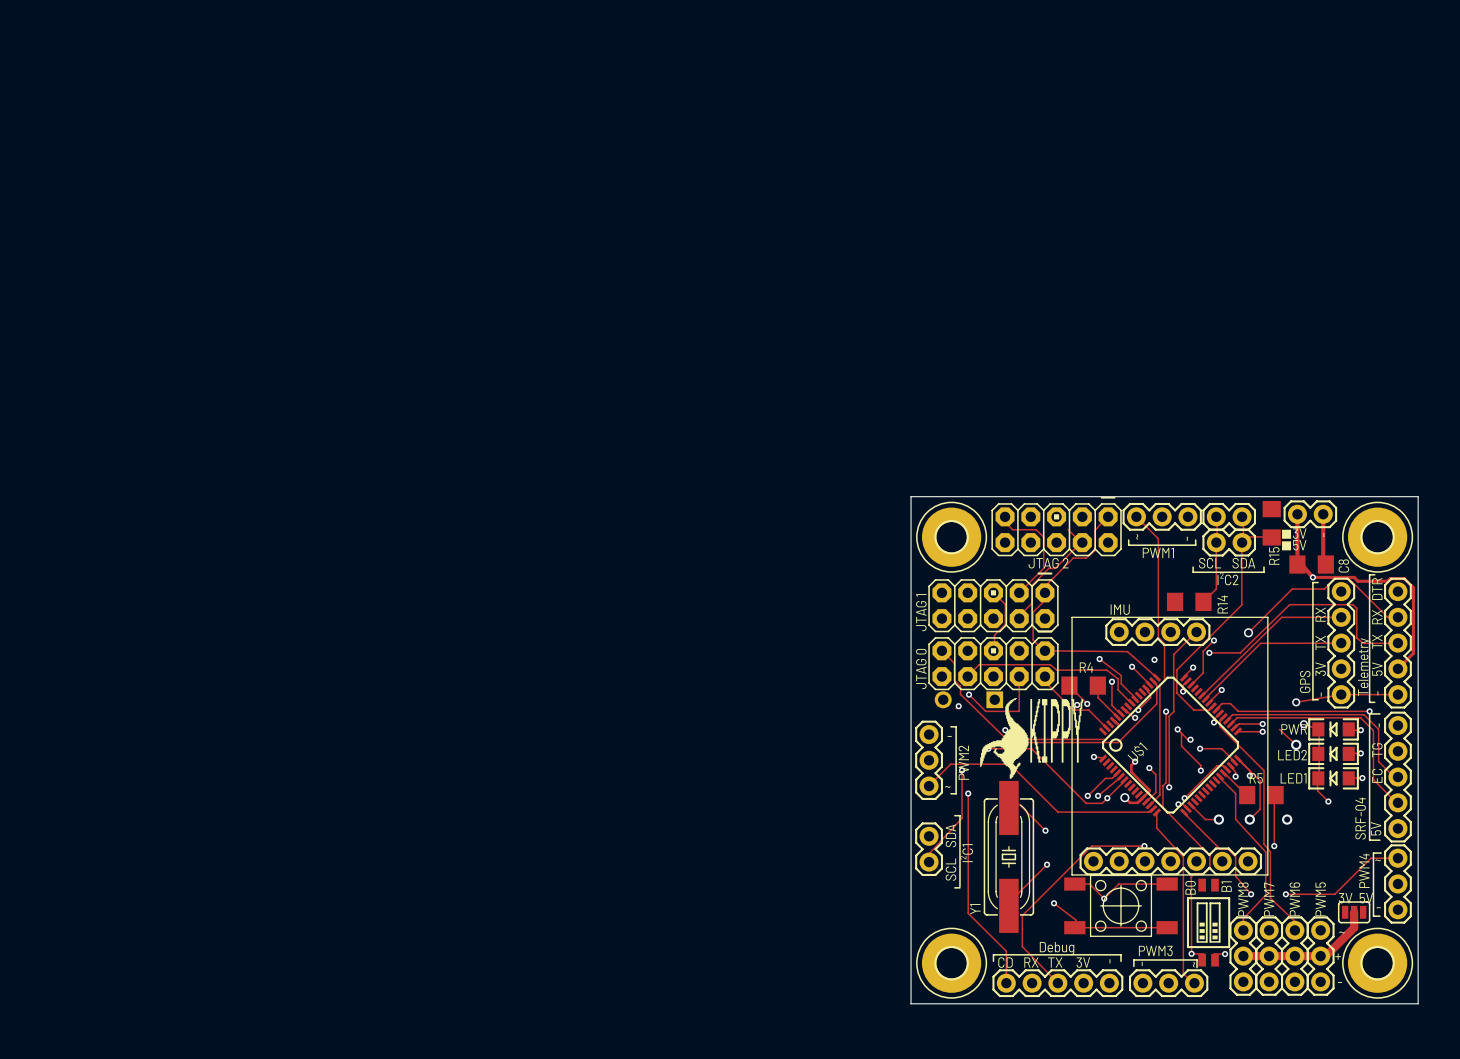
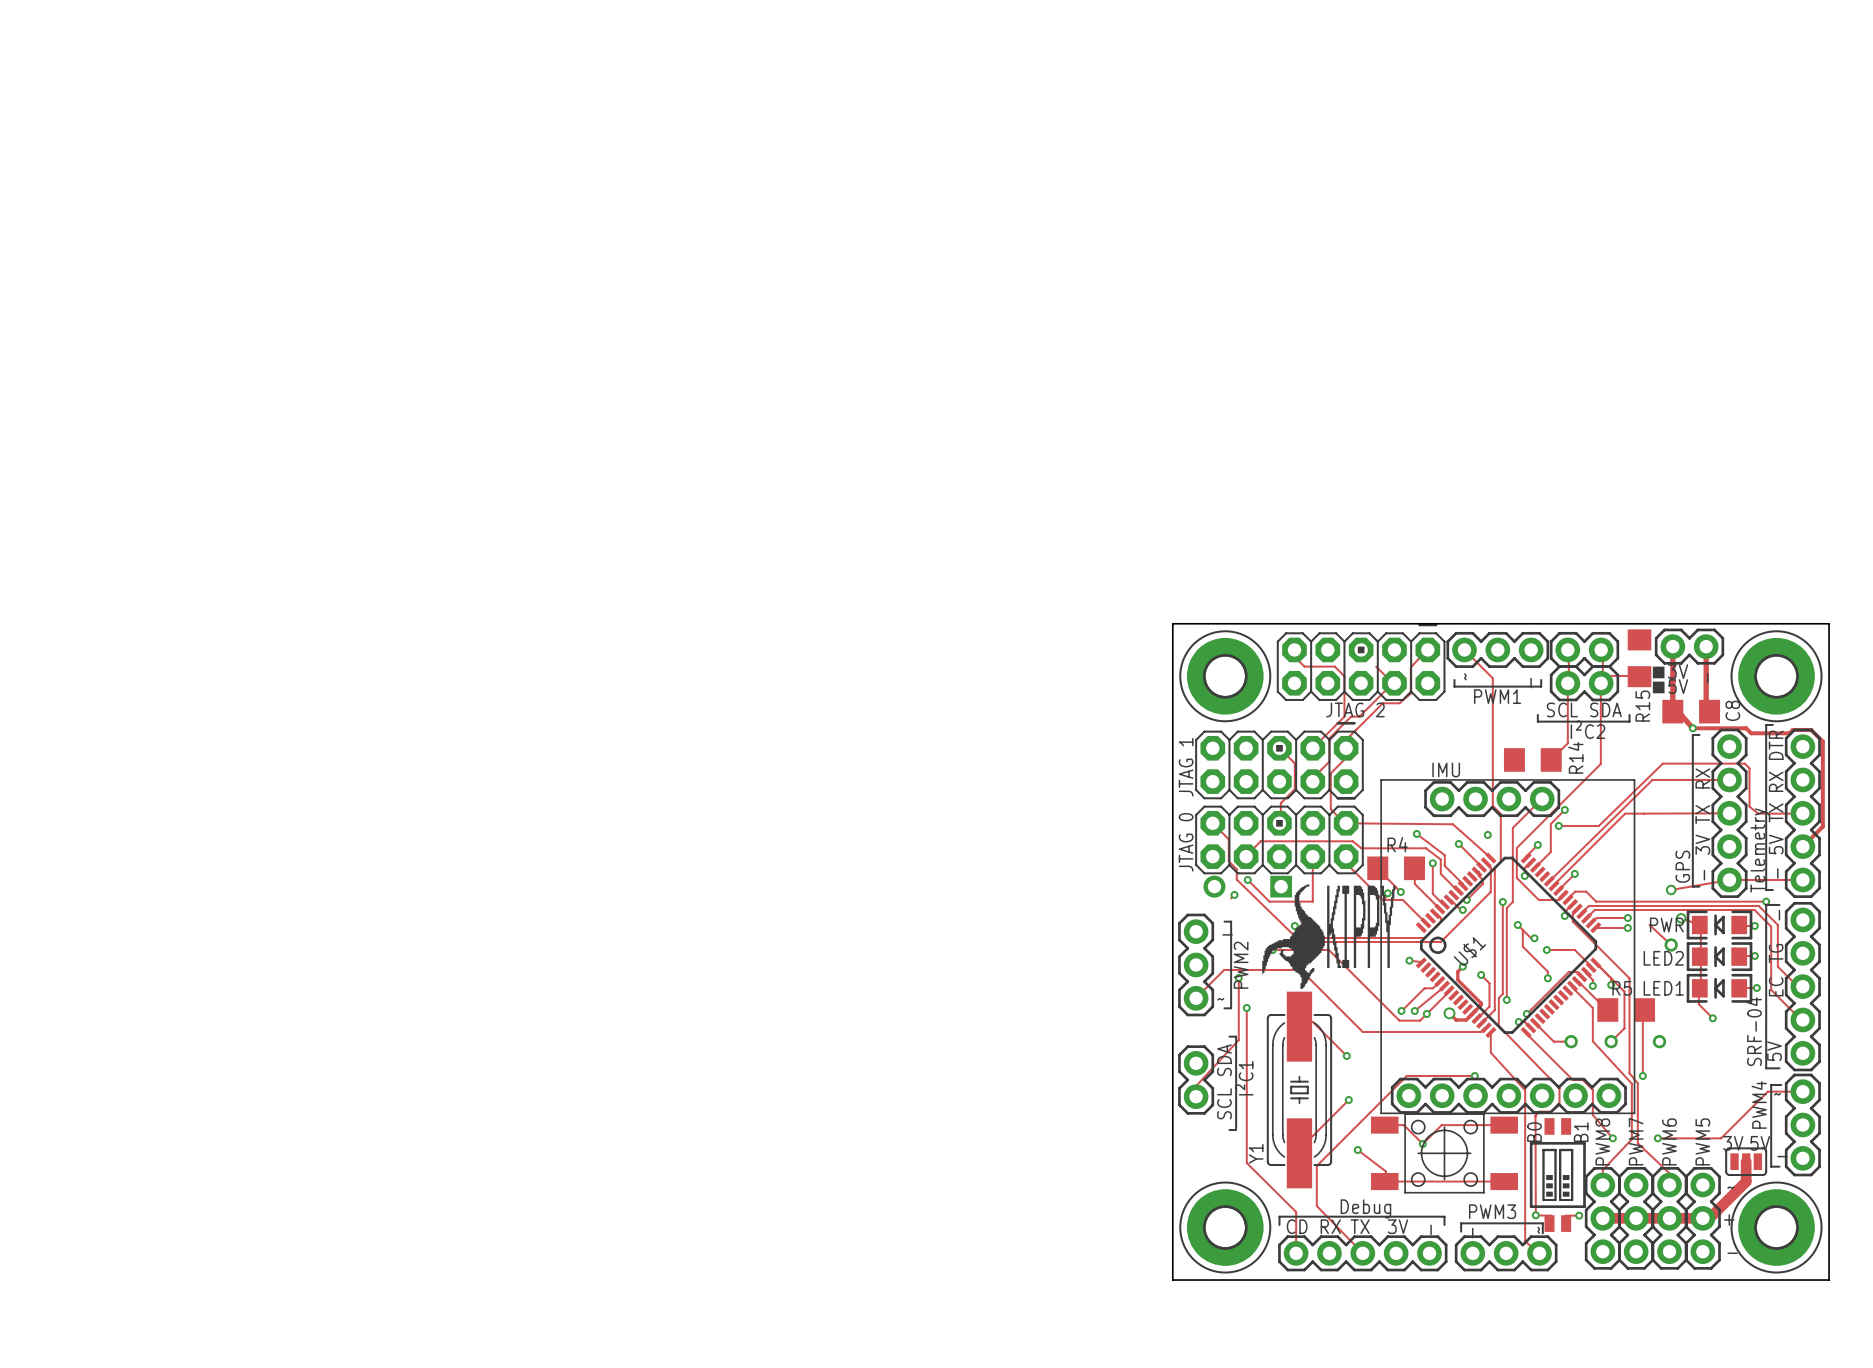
track: (1397, 617) (1387, 617) (1349, 578) (1334, 578) (1324, 588) (1292, 588) (1248, 632) -> none
via: (1248, 632) -> none

